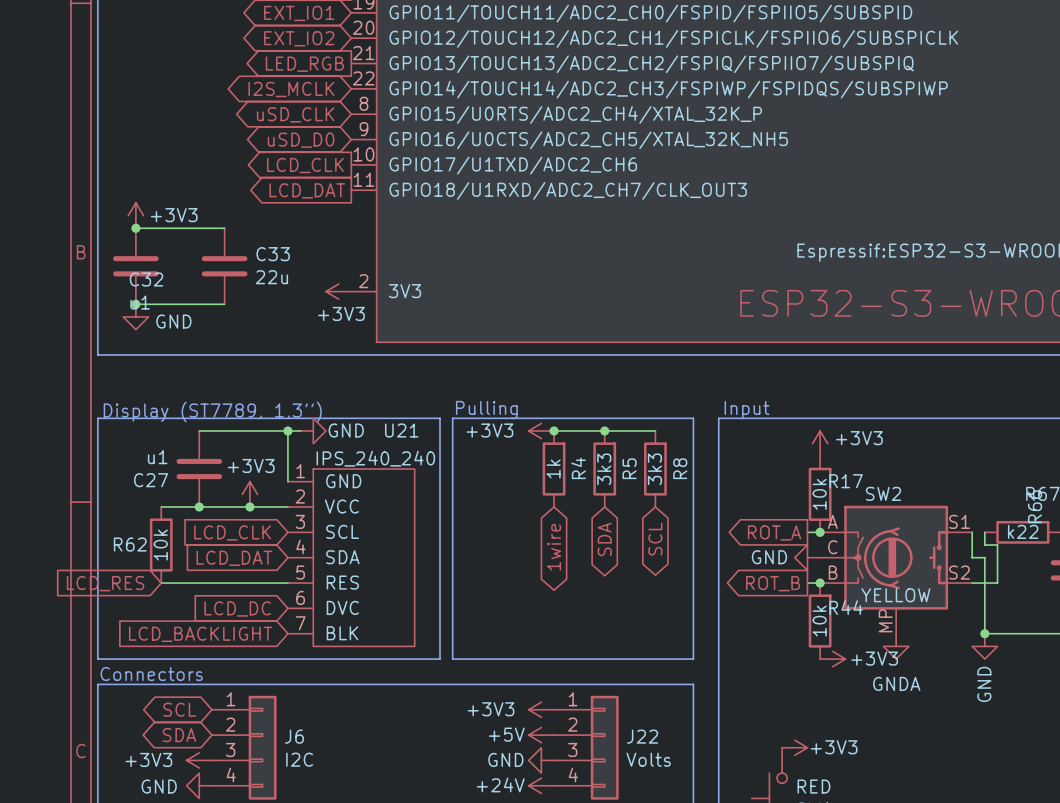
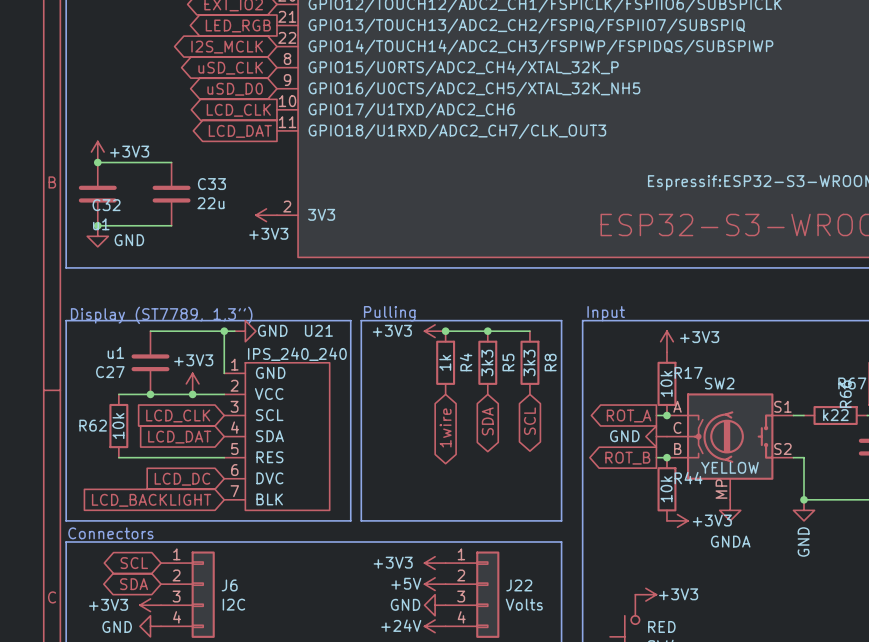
wire: (972, 532) (972, 557) (984, 557) (984, 583) (997, 583) (997, 545) (984, 545) (984, 532) -> (793, 415) (804, 415)
global label: LCD_RES (105, 583) -> none

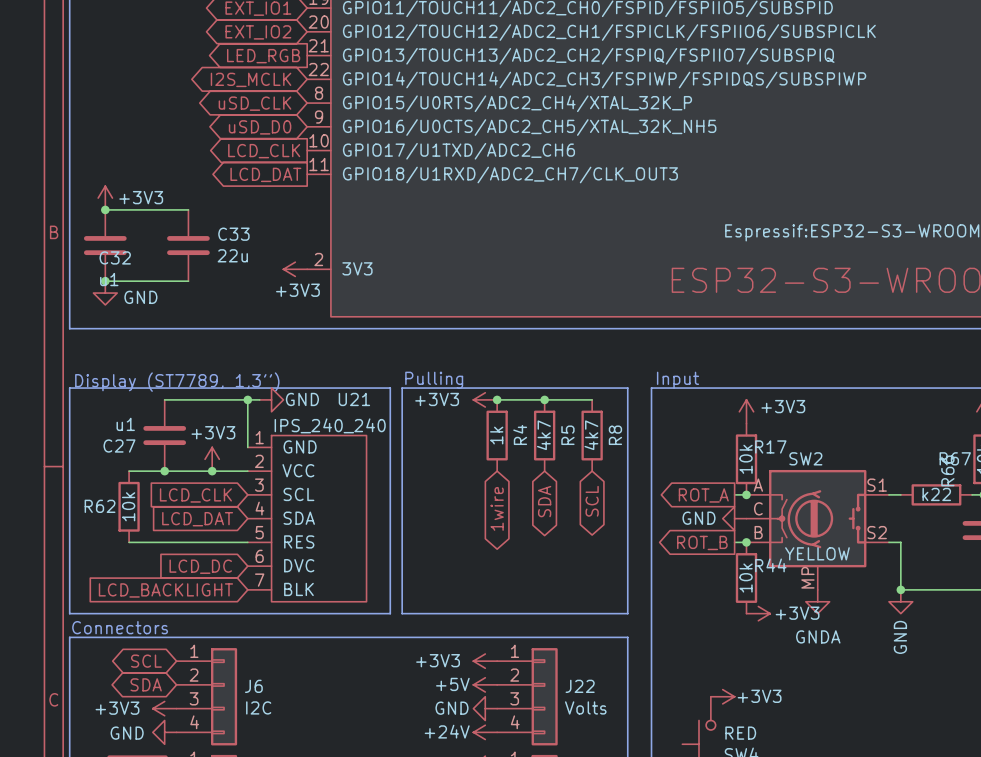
R5 value: 3k3 (487, 363) -> 4k7 (543, 435)
R8 value: 3k3 (529, 363) -> 4k7 (591, 435)

